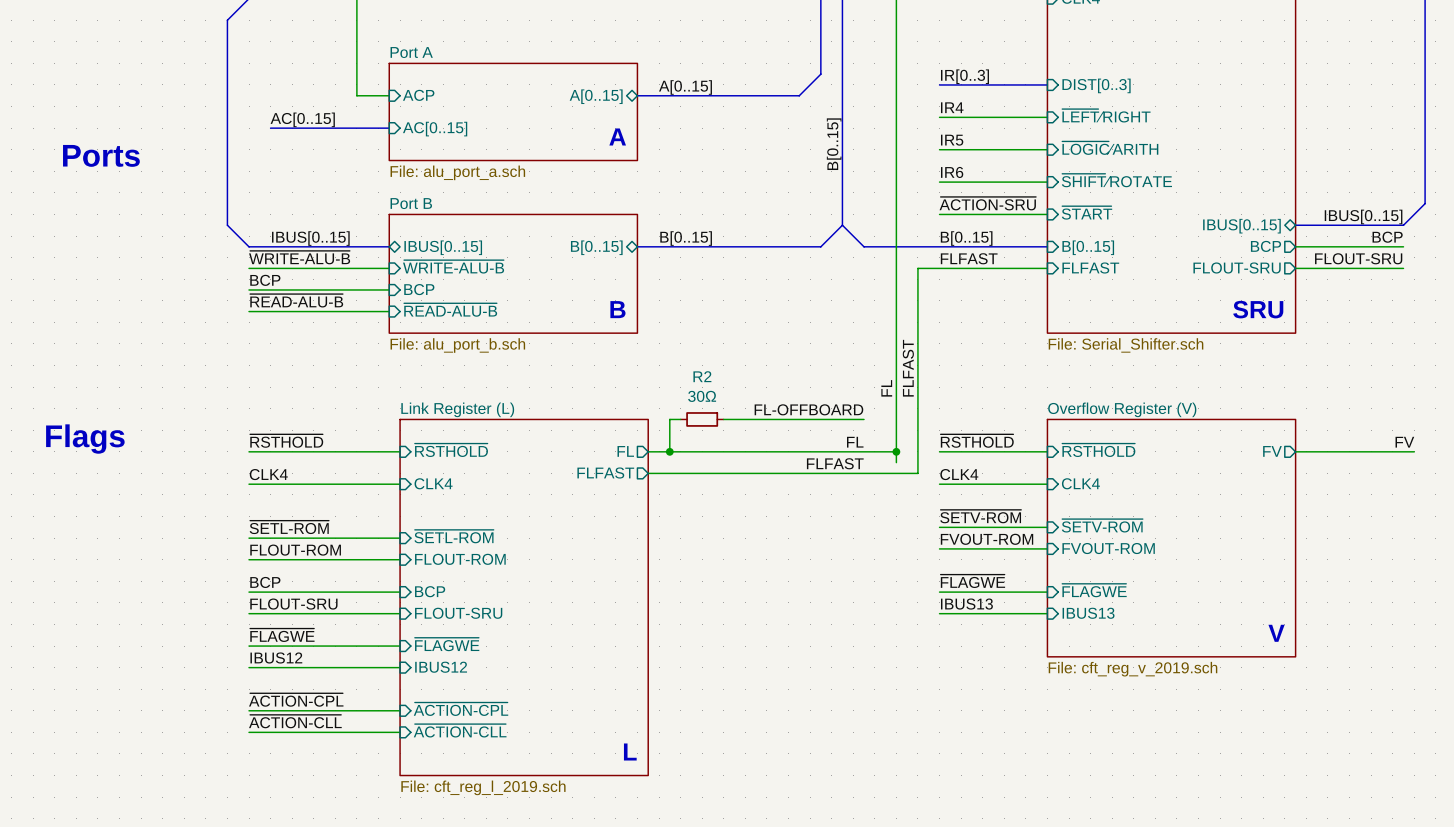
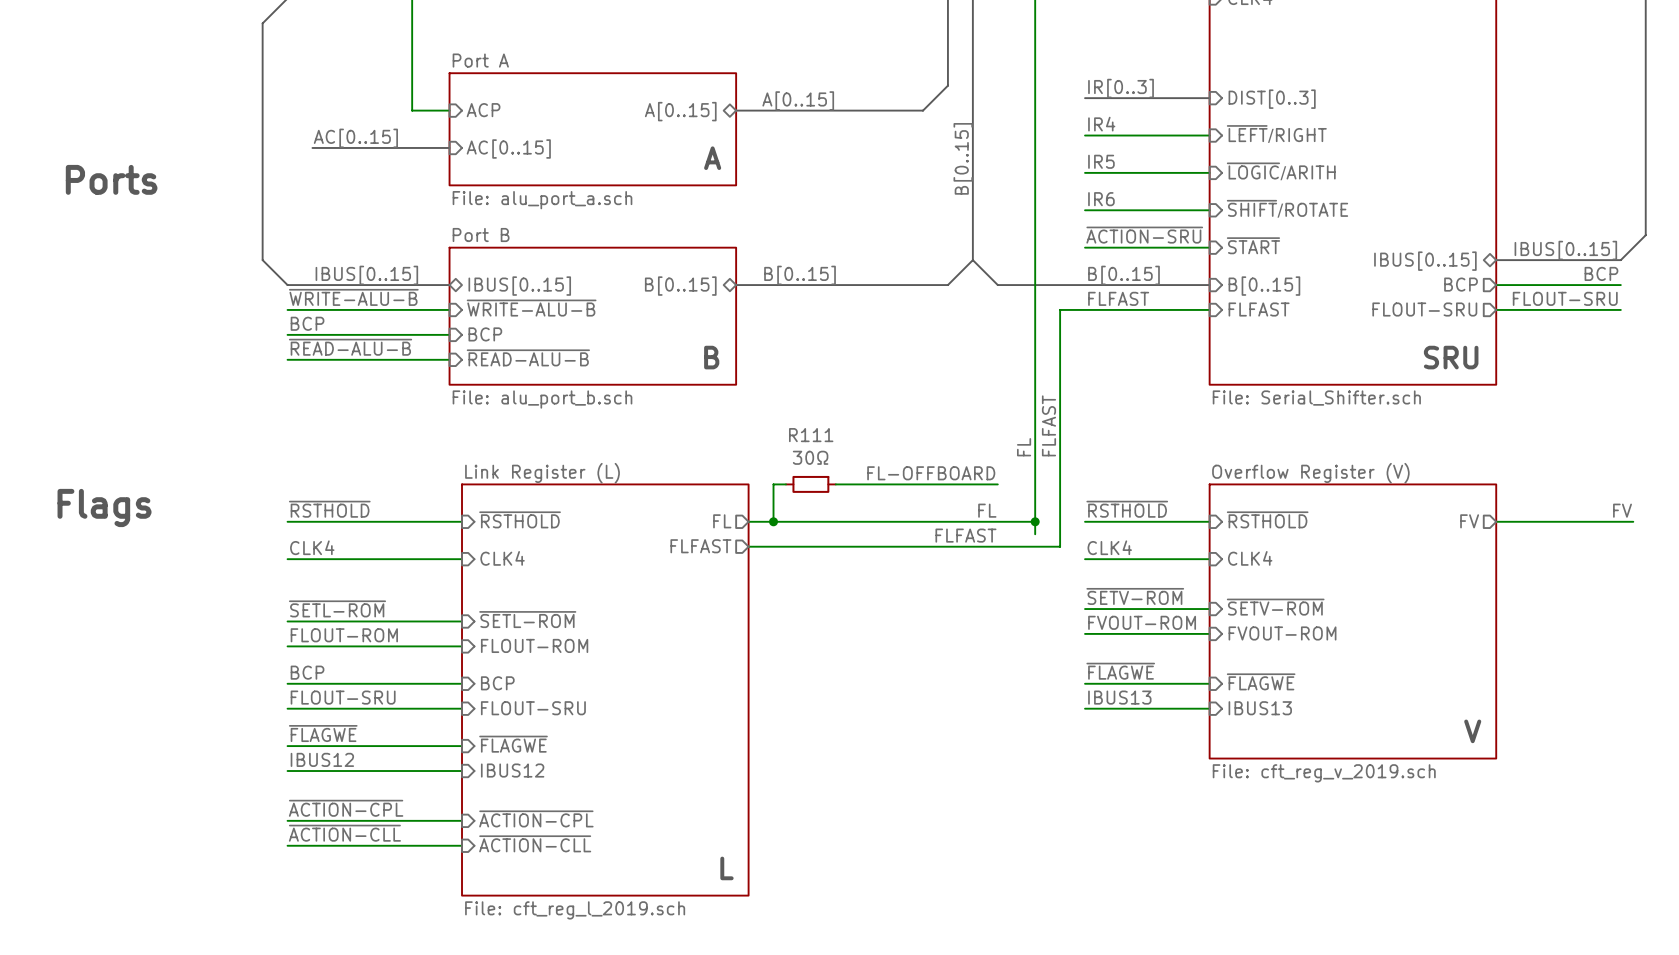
R2 name: R2 (702, 376) -> R111 (811, 435)

